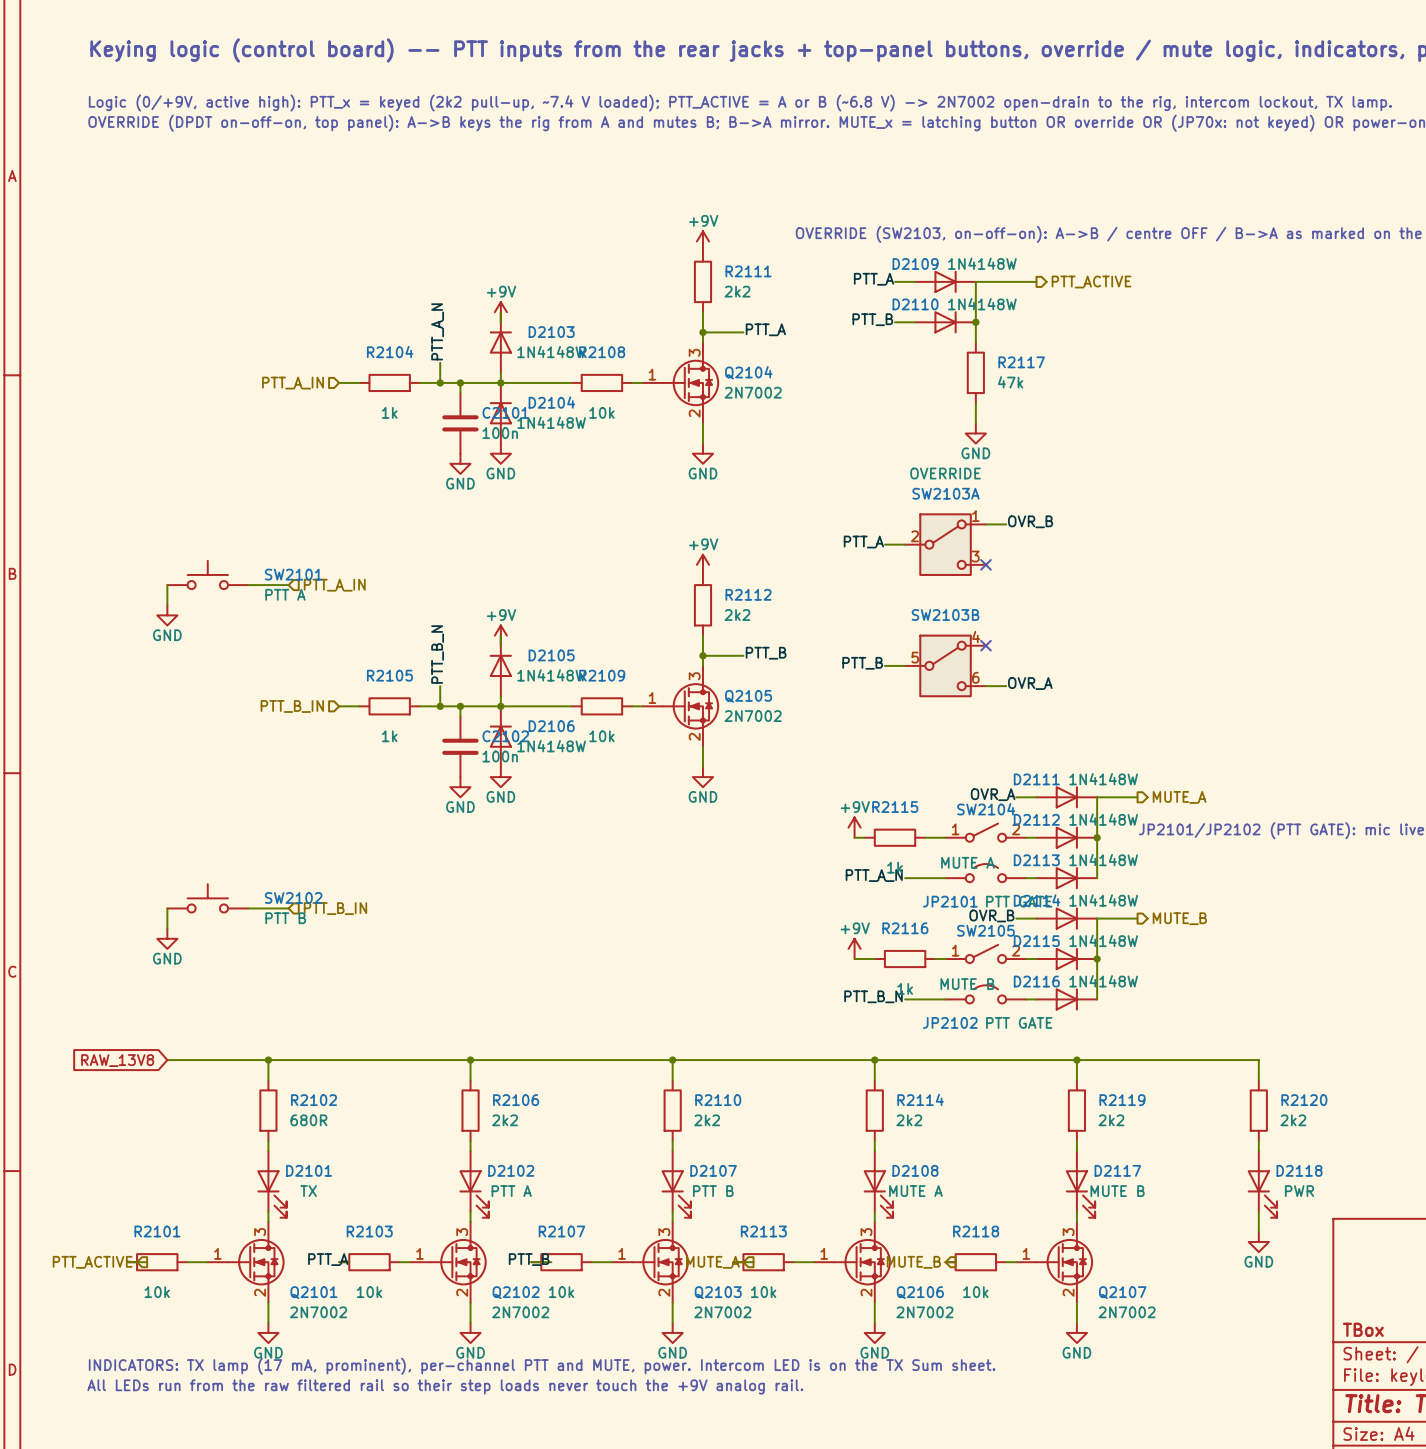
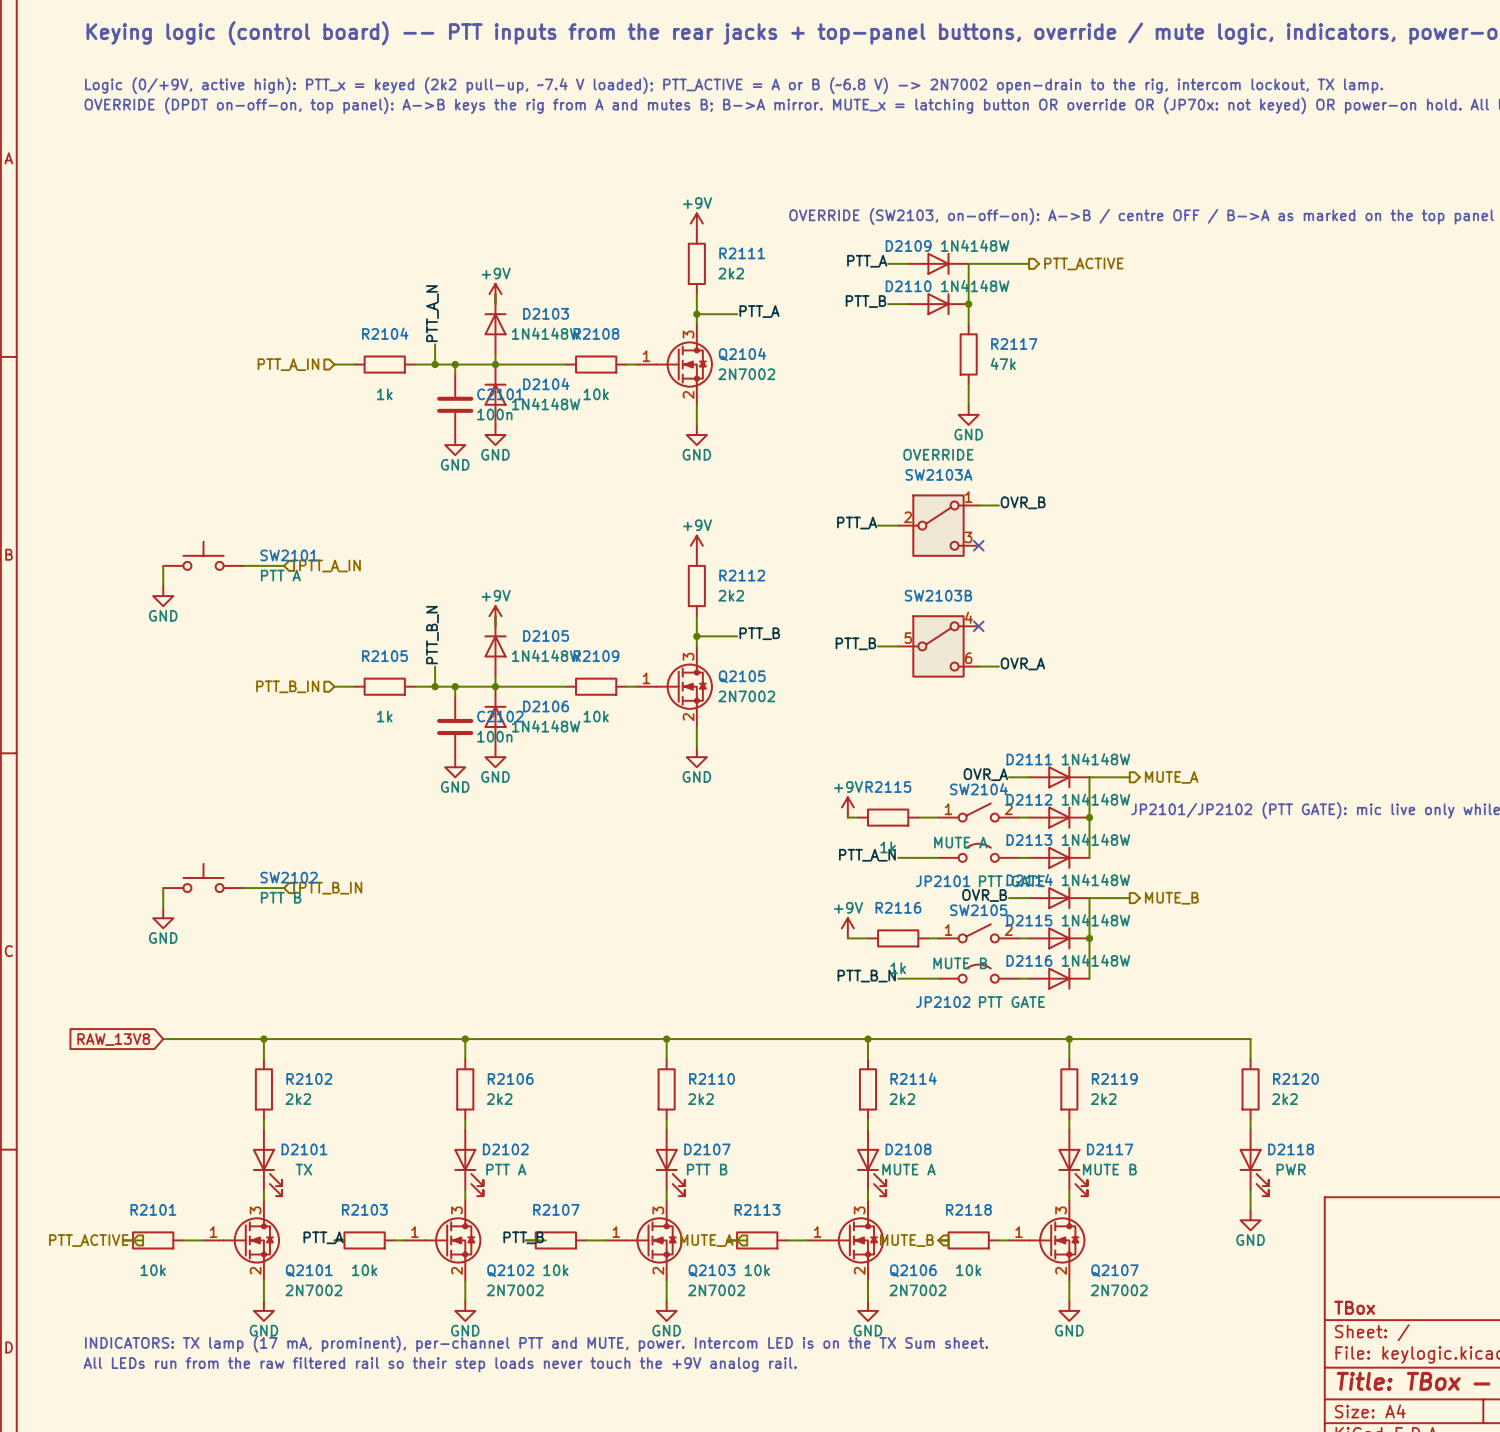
R2102 value: 680R (308, 1120) -> 2k2 (298, 1099)

